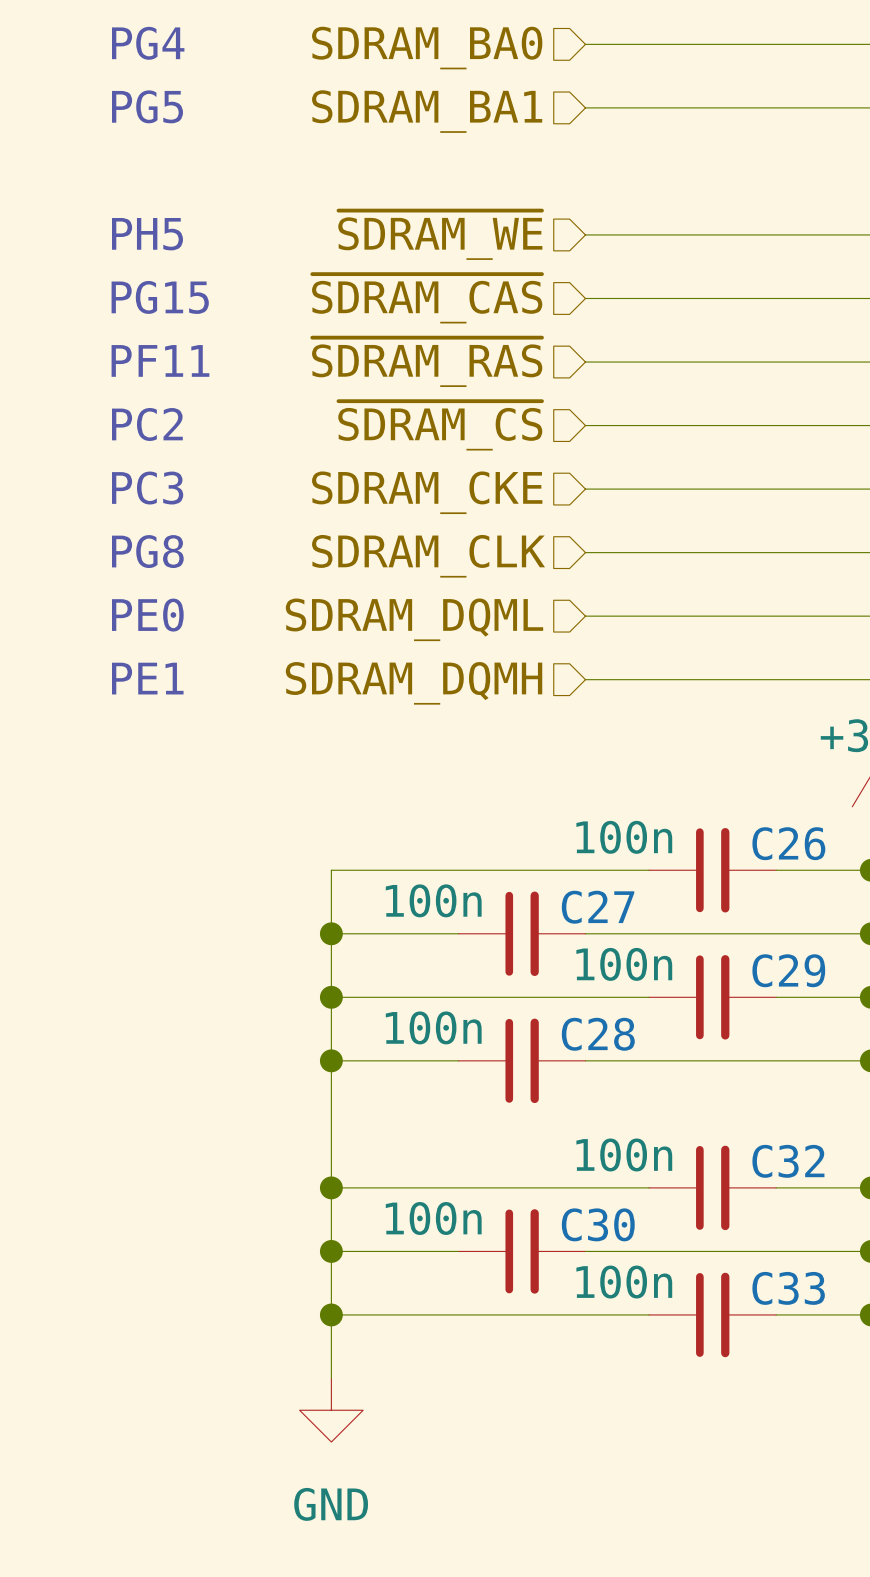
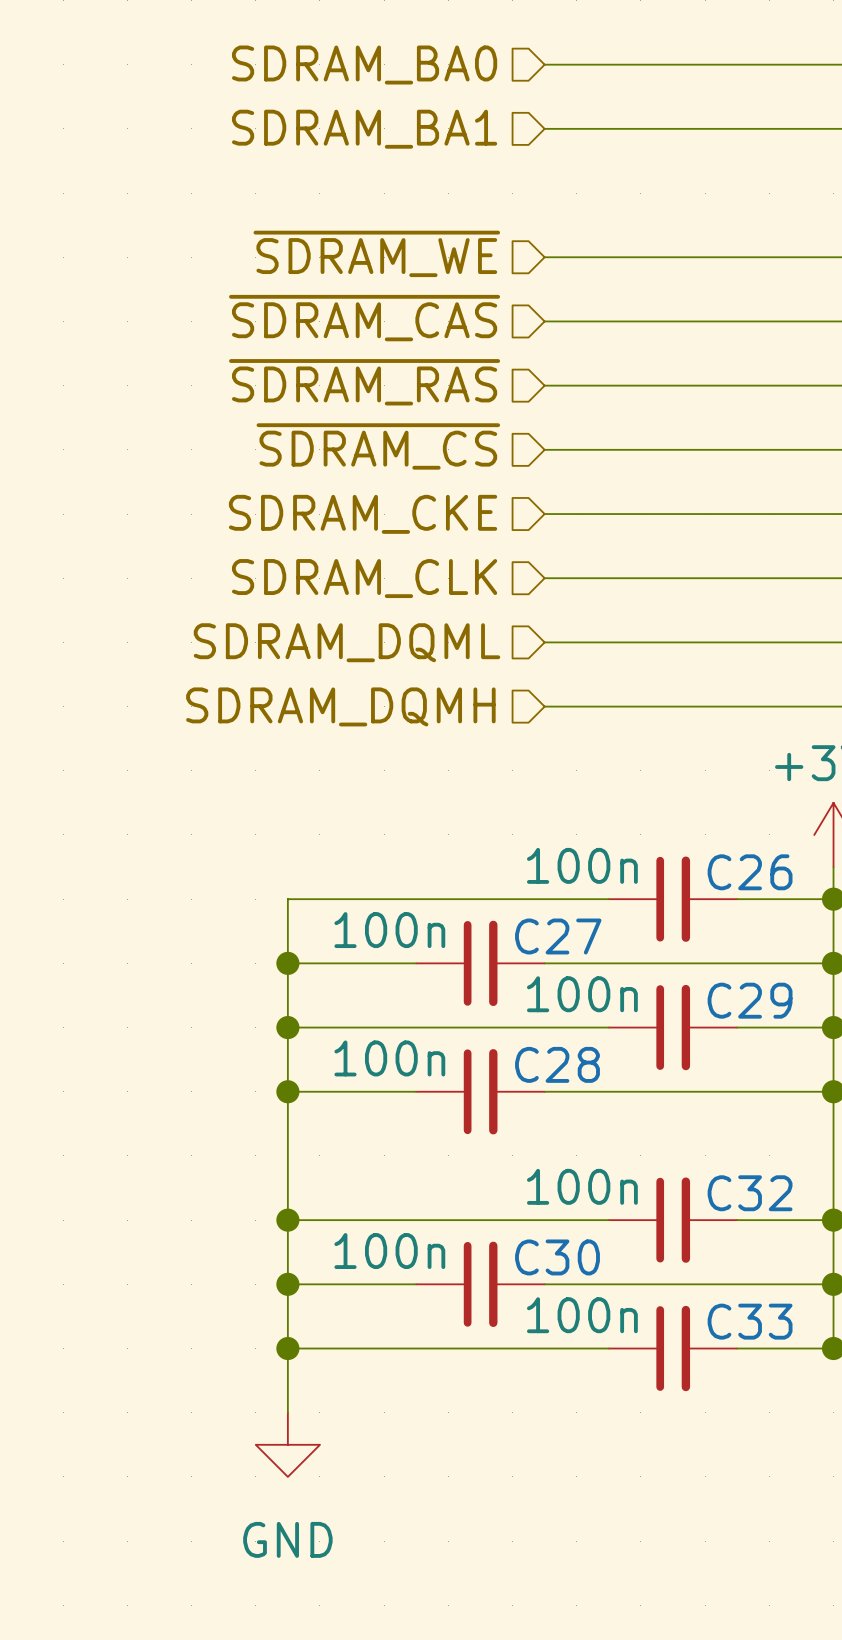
text: PG4 (148, 43) -> none
text: PG5 (147, 106) -> none
text: PH5 (147, 234) -> none
text: PG15 (160, 297) -> none
text: PF11 (160, 360) -> none
text: PC2 (147, 424) -> none
text: PC3 (147, 488) -> none
text: PG8 (147, 551) -> none
text: PE0 (147, 615) -> none
text: PE1 (147, 678) -> none

